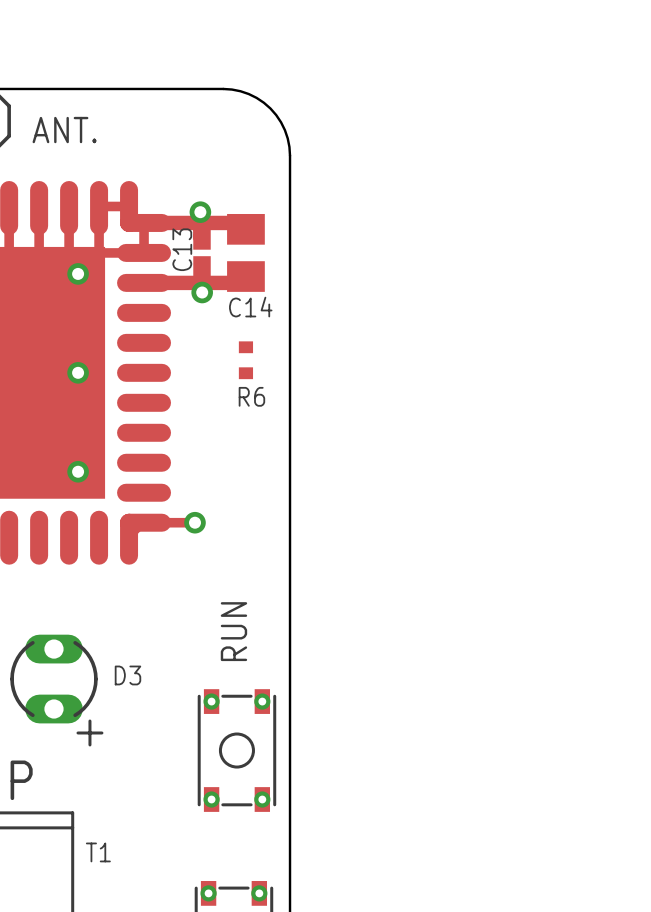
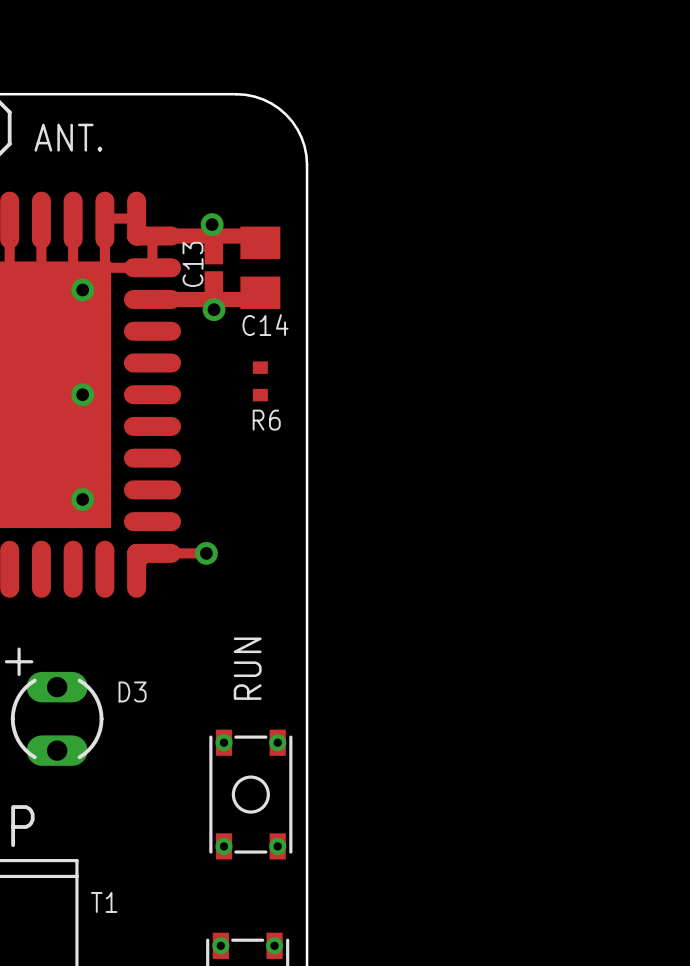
D3 rotation: 0° (56, 690) -> 180° (54, 706)

